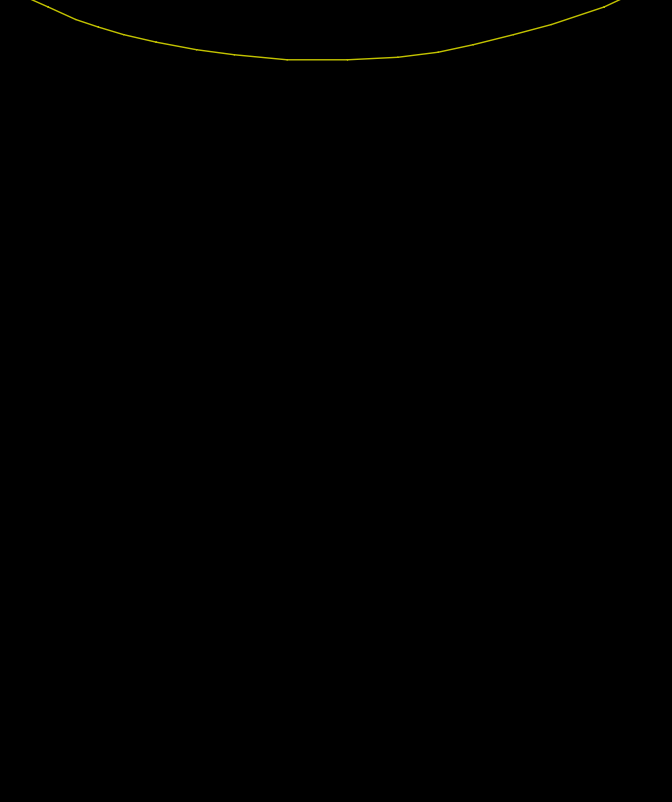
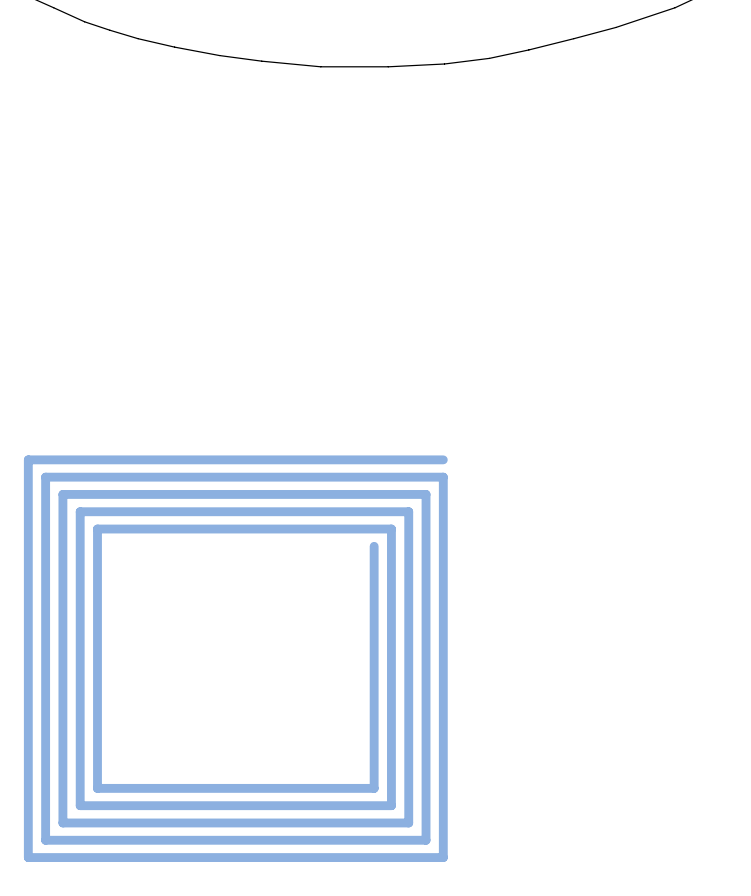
bottom track: none -> (443, 459) (28, 459) (28, 857) (443, 857) (443, 477) (45, 477) (45, 840) (426, 840) (426, 494) (62, 494) (62, 822) (408, 822) (408, 511) (80, 511) (80, 805) (391, 805) (391, 529) (97, 529) (97, 788) (374, 788) (374, 546)

